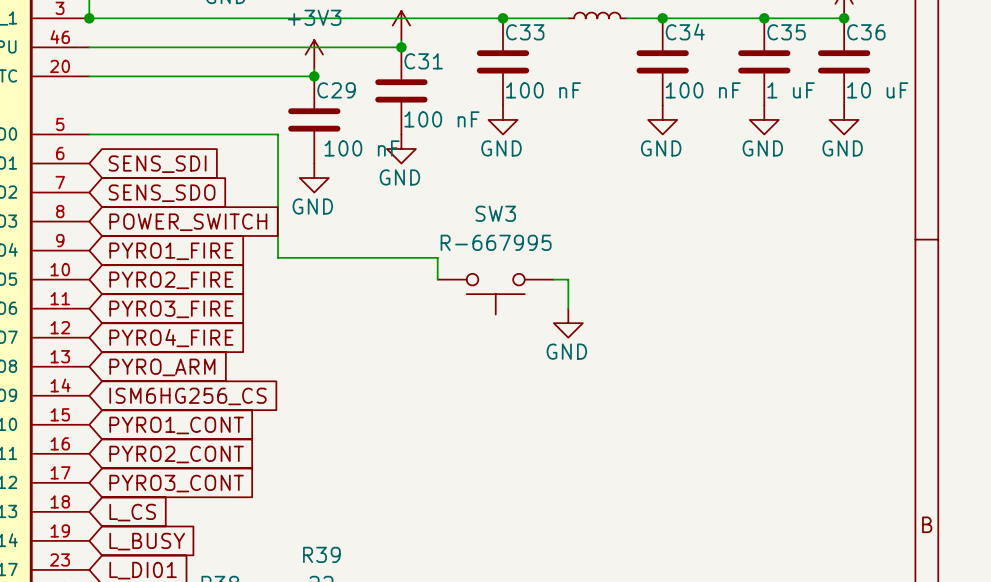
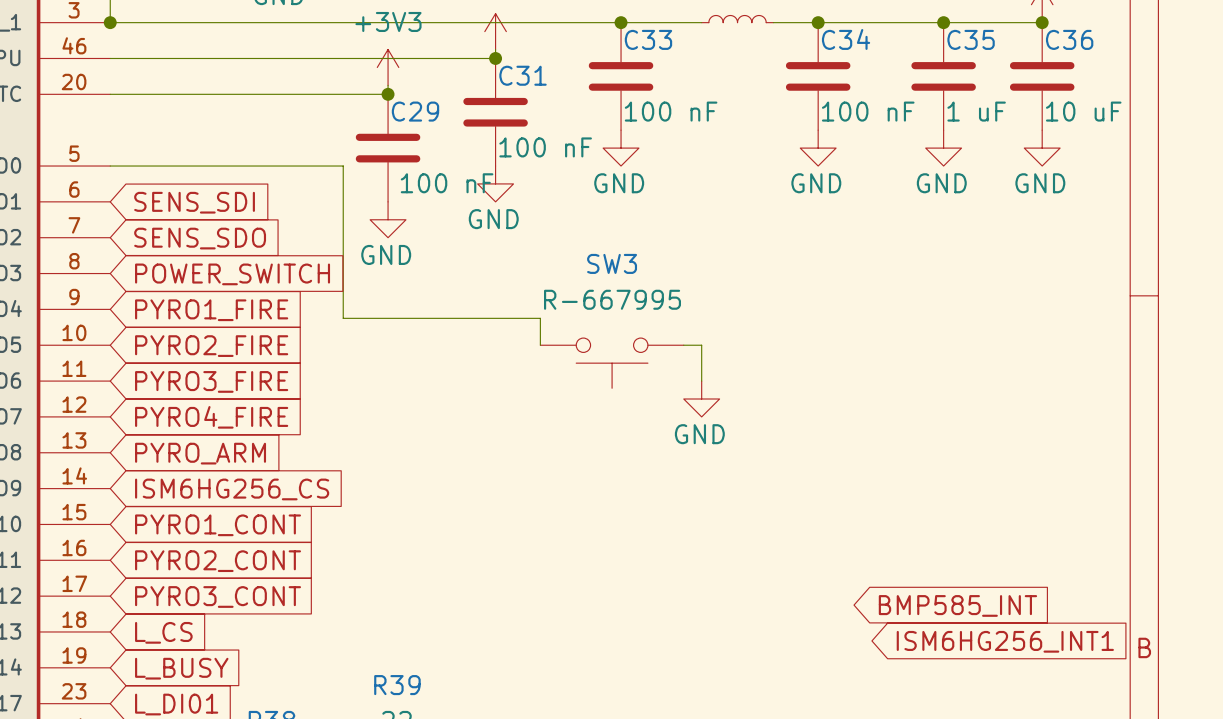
global label: none -> BMP585_INT (957, 605)
global label: none -> ISM6HG256_INT1 (1005, 641)

